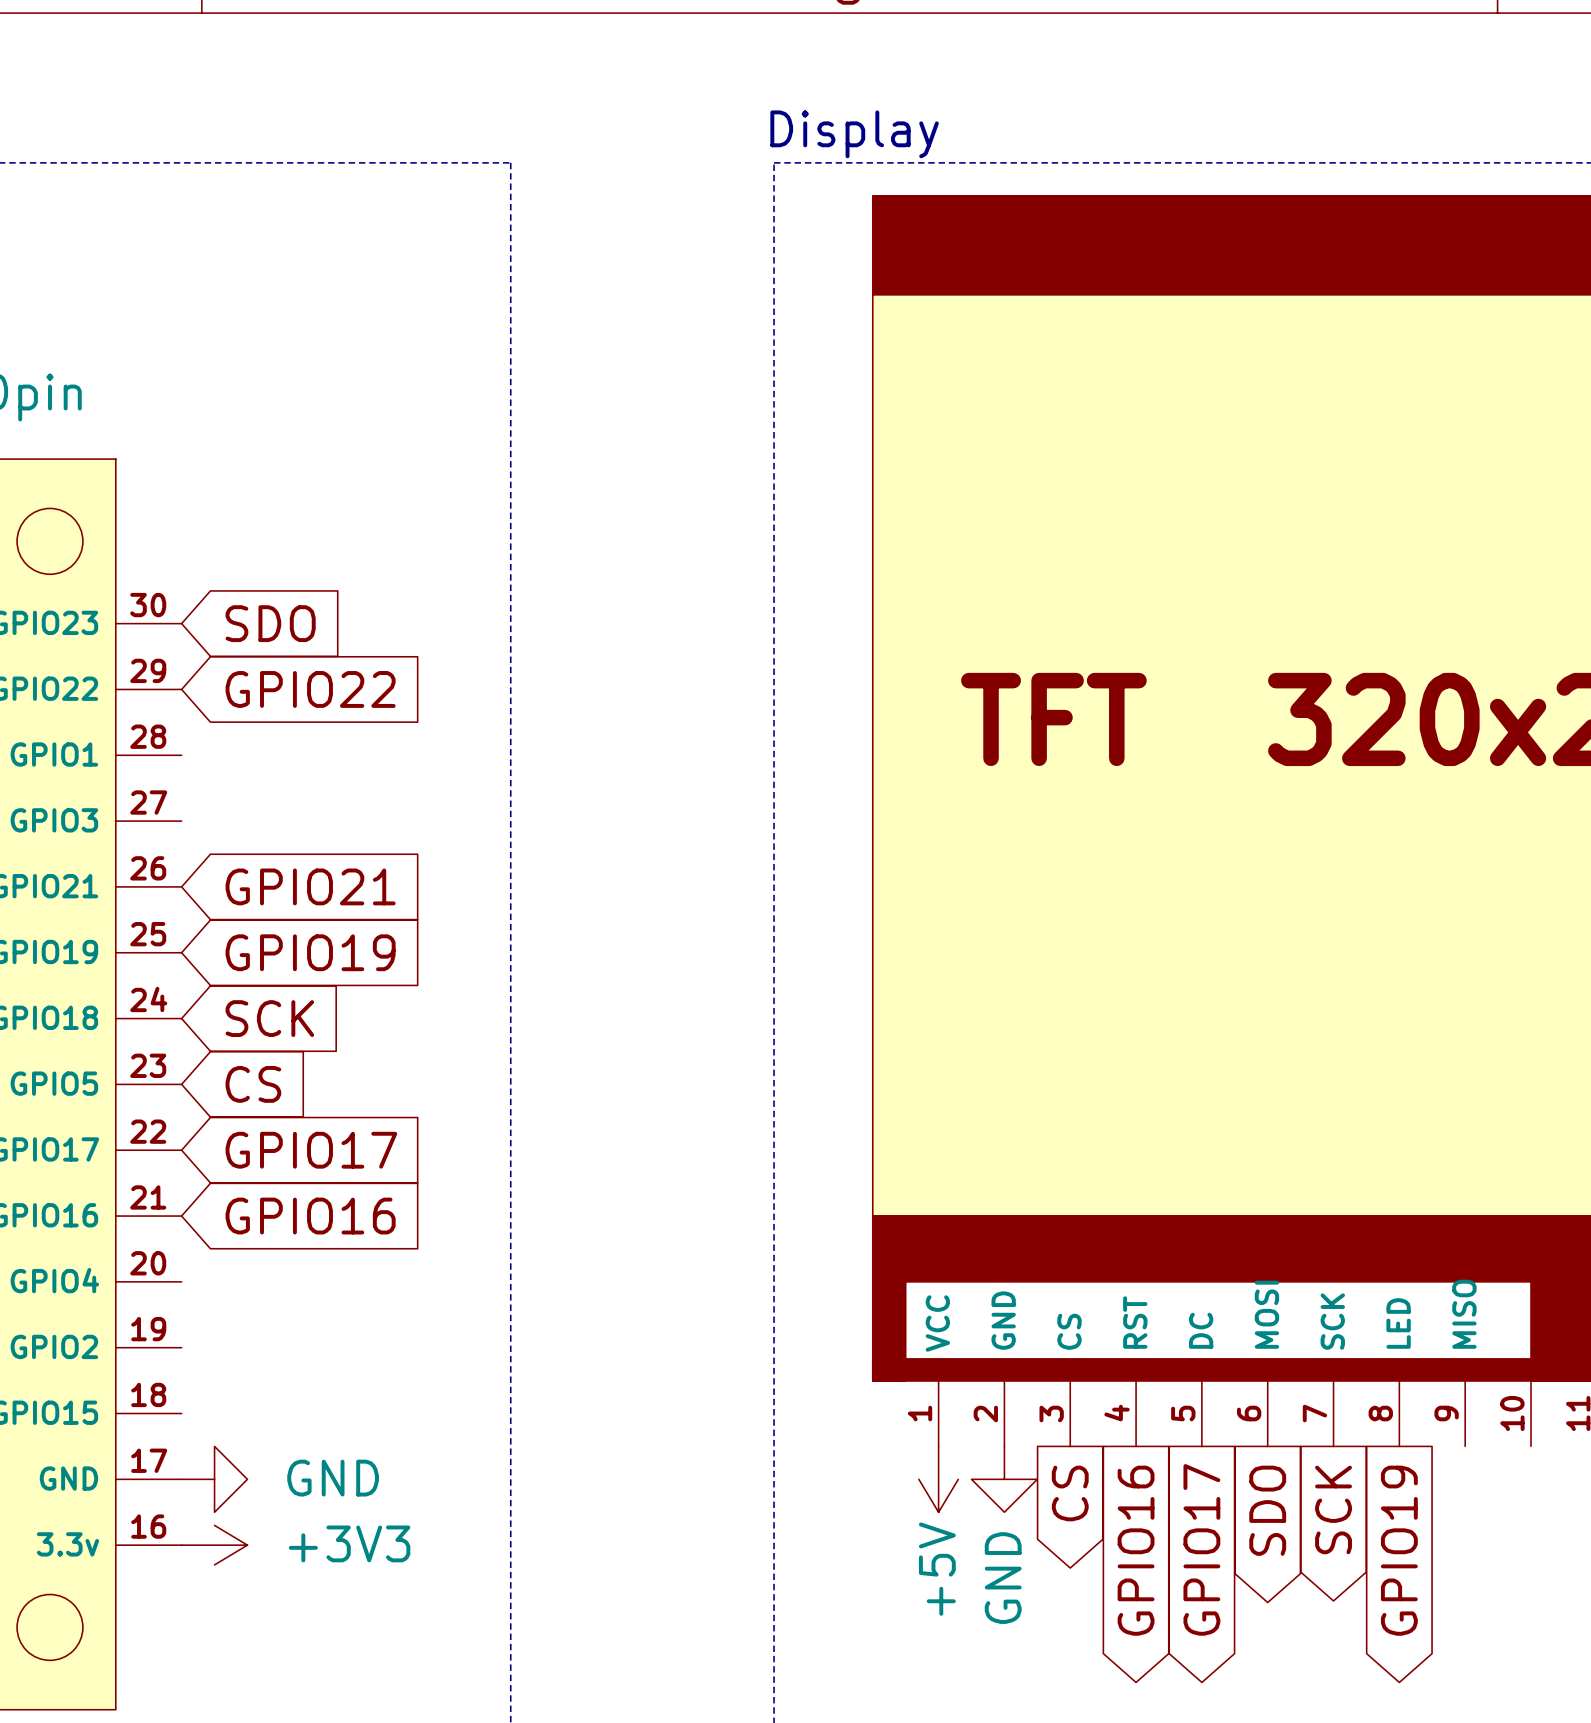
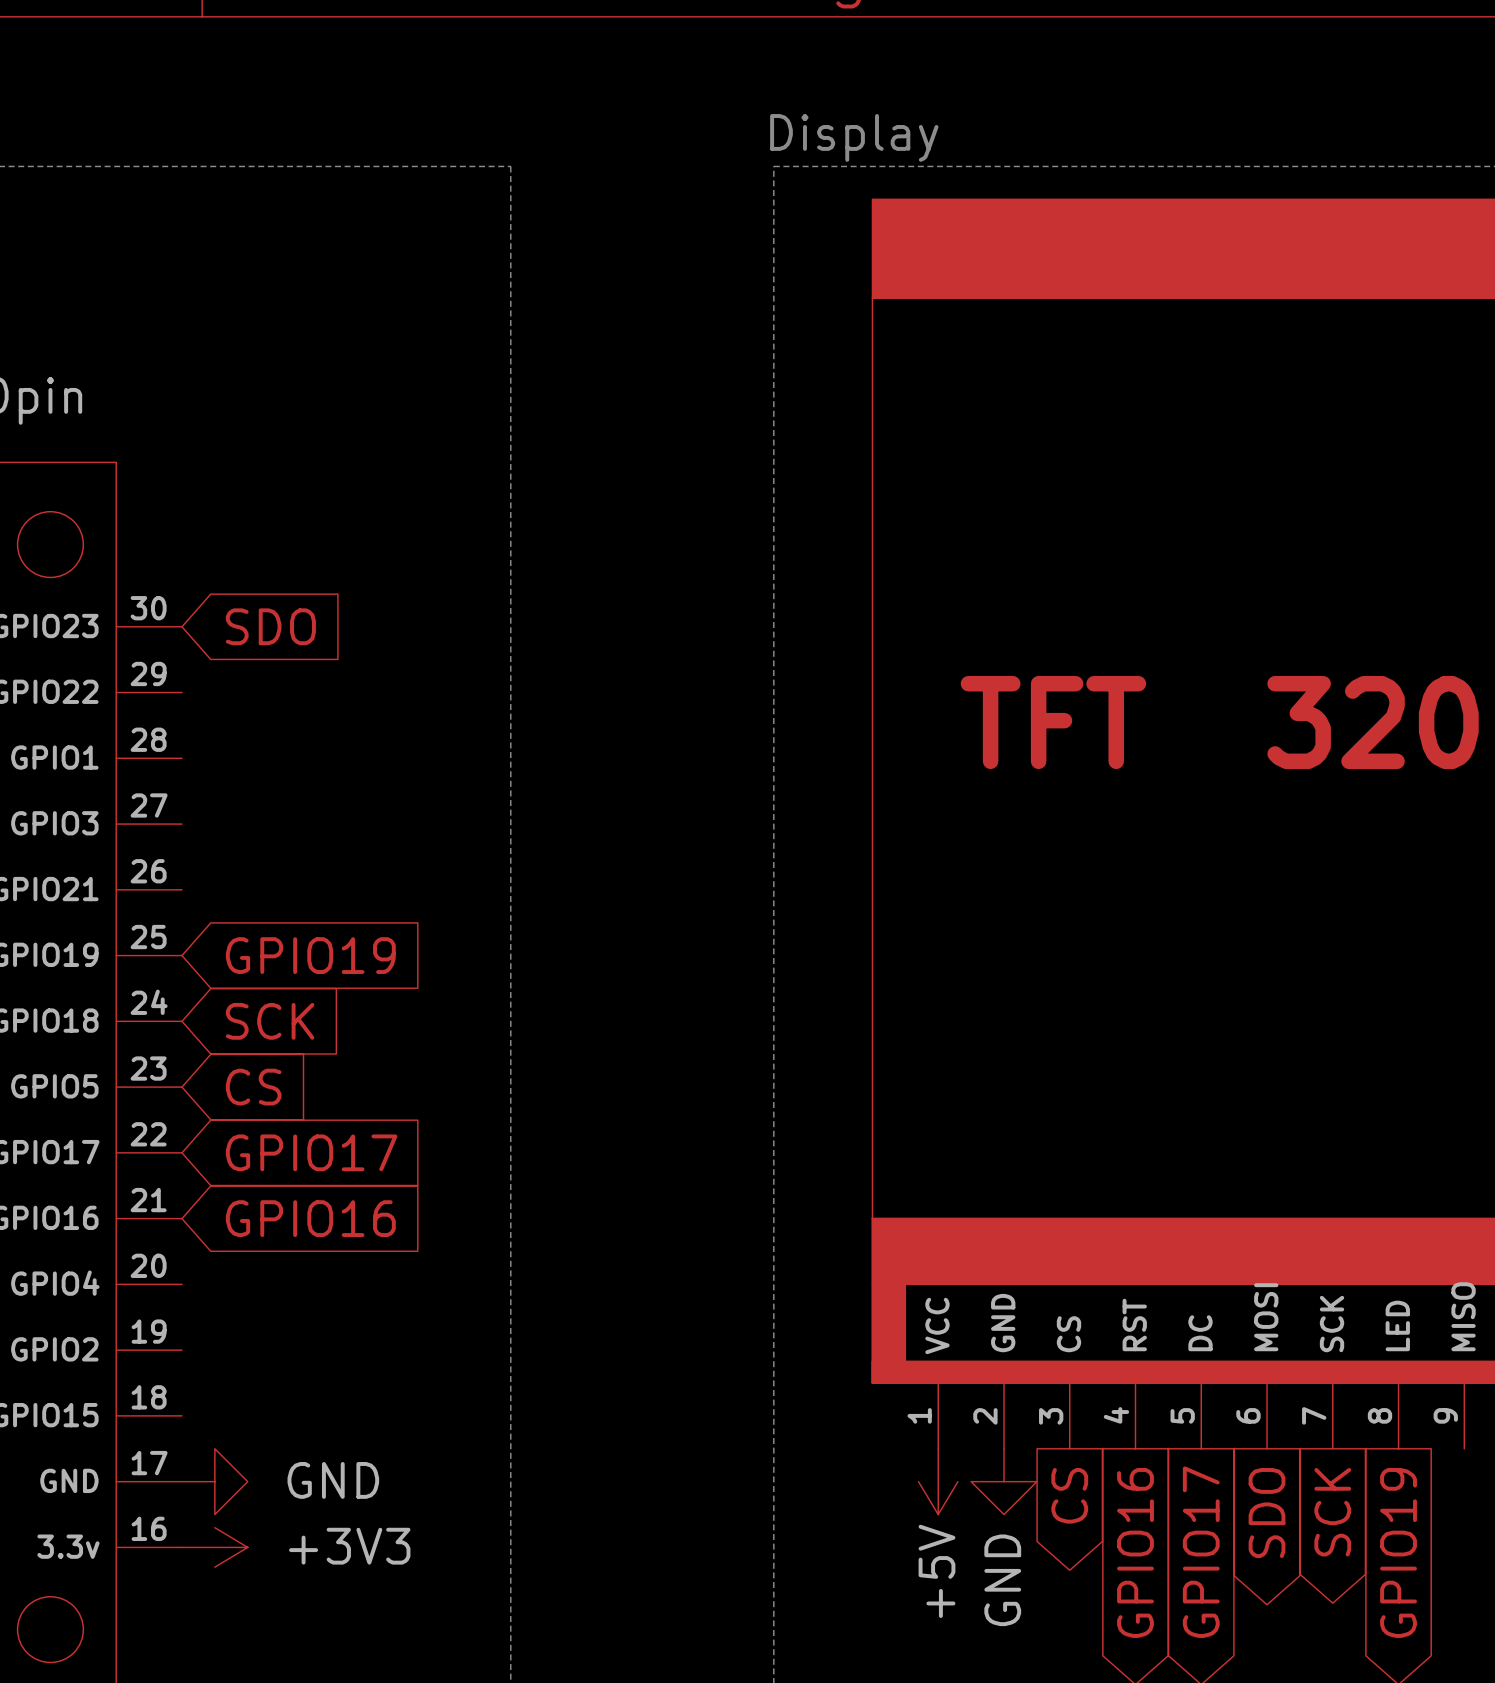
global label: GPIO22 (310, 689) -> none
global label: GPIO21 (310, 886) -> none

